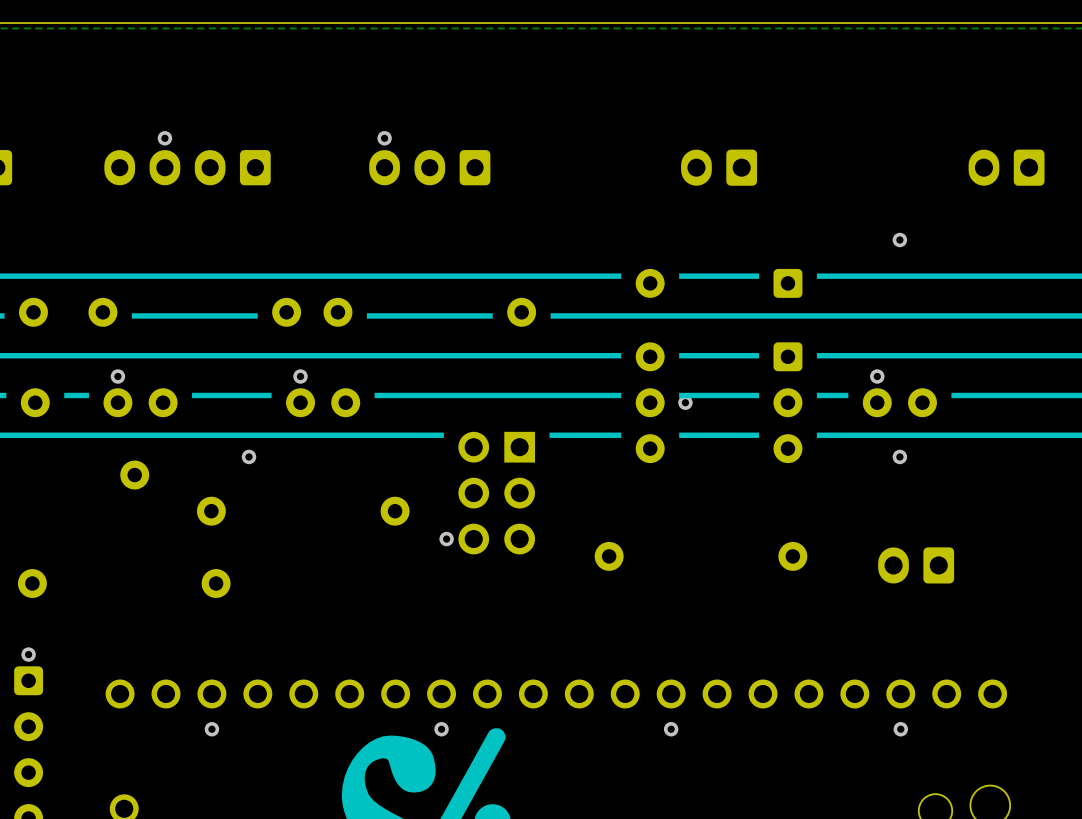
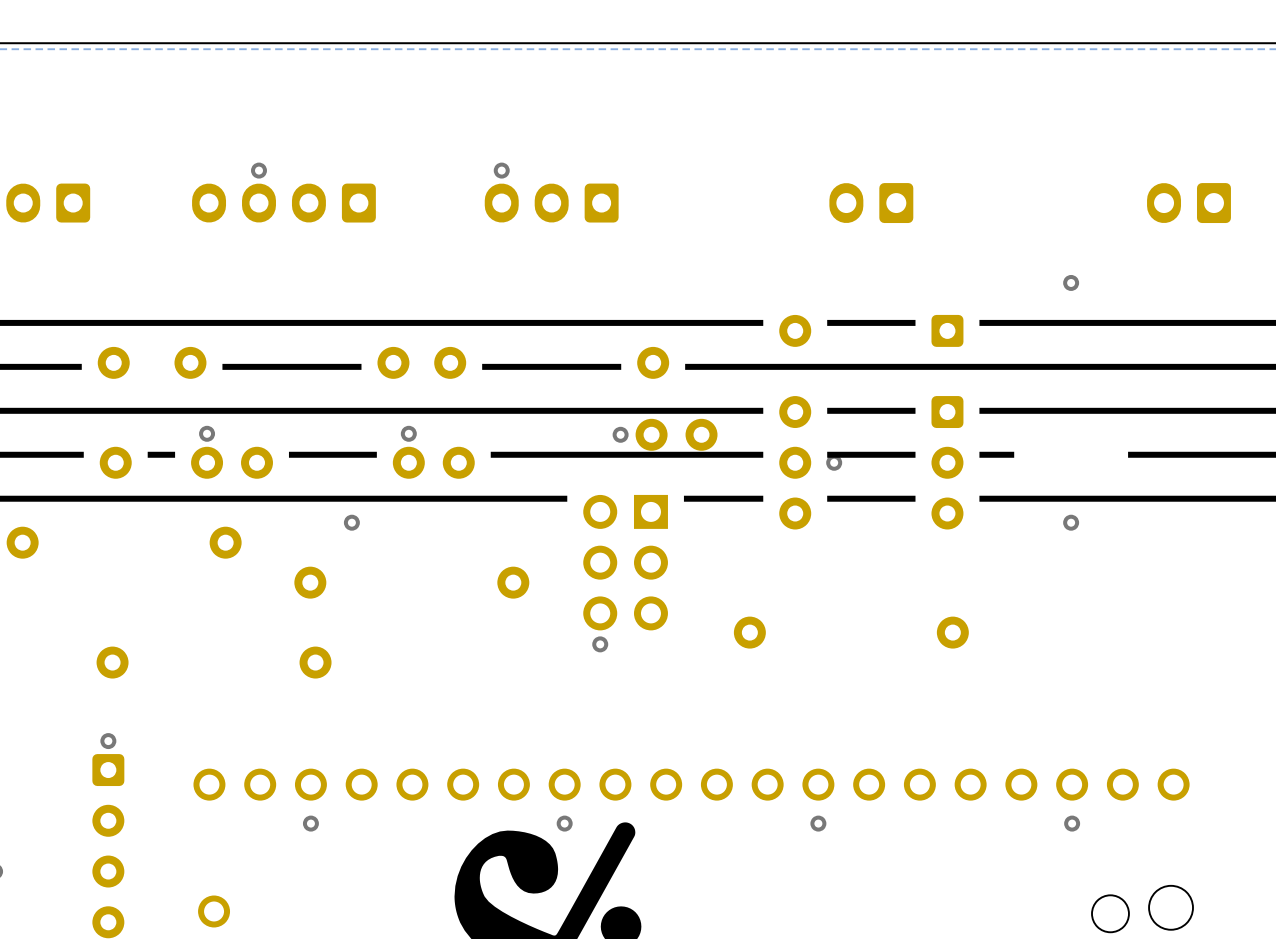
via: (877, 376) -> none
via: none -> (620, 434)
part position: (899, 402) -> (676, 434)
via position: (446, 539) -> (600, 644)
part: (916, 565) -> none

